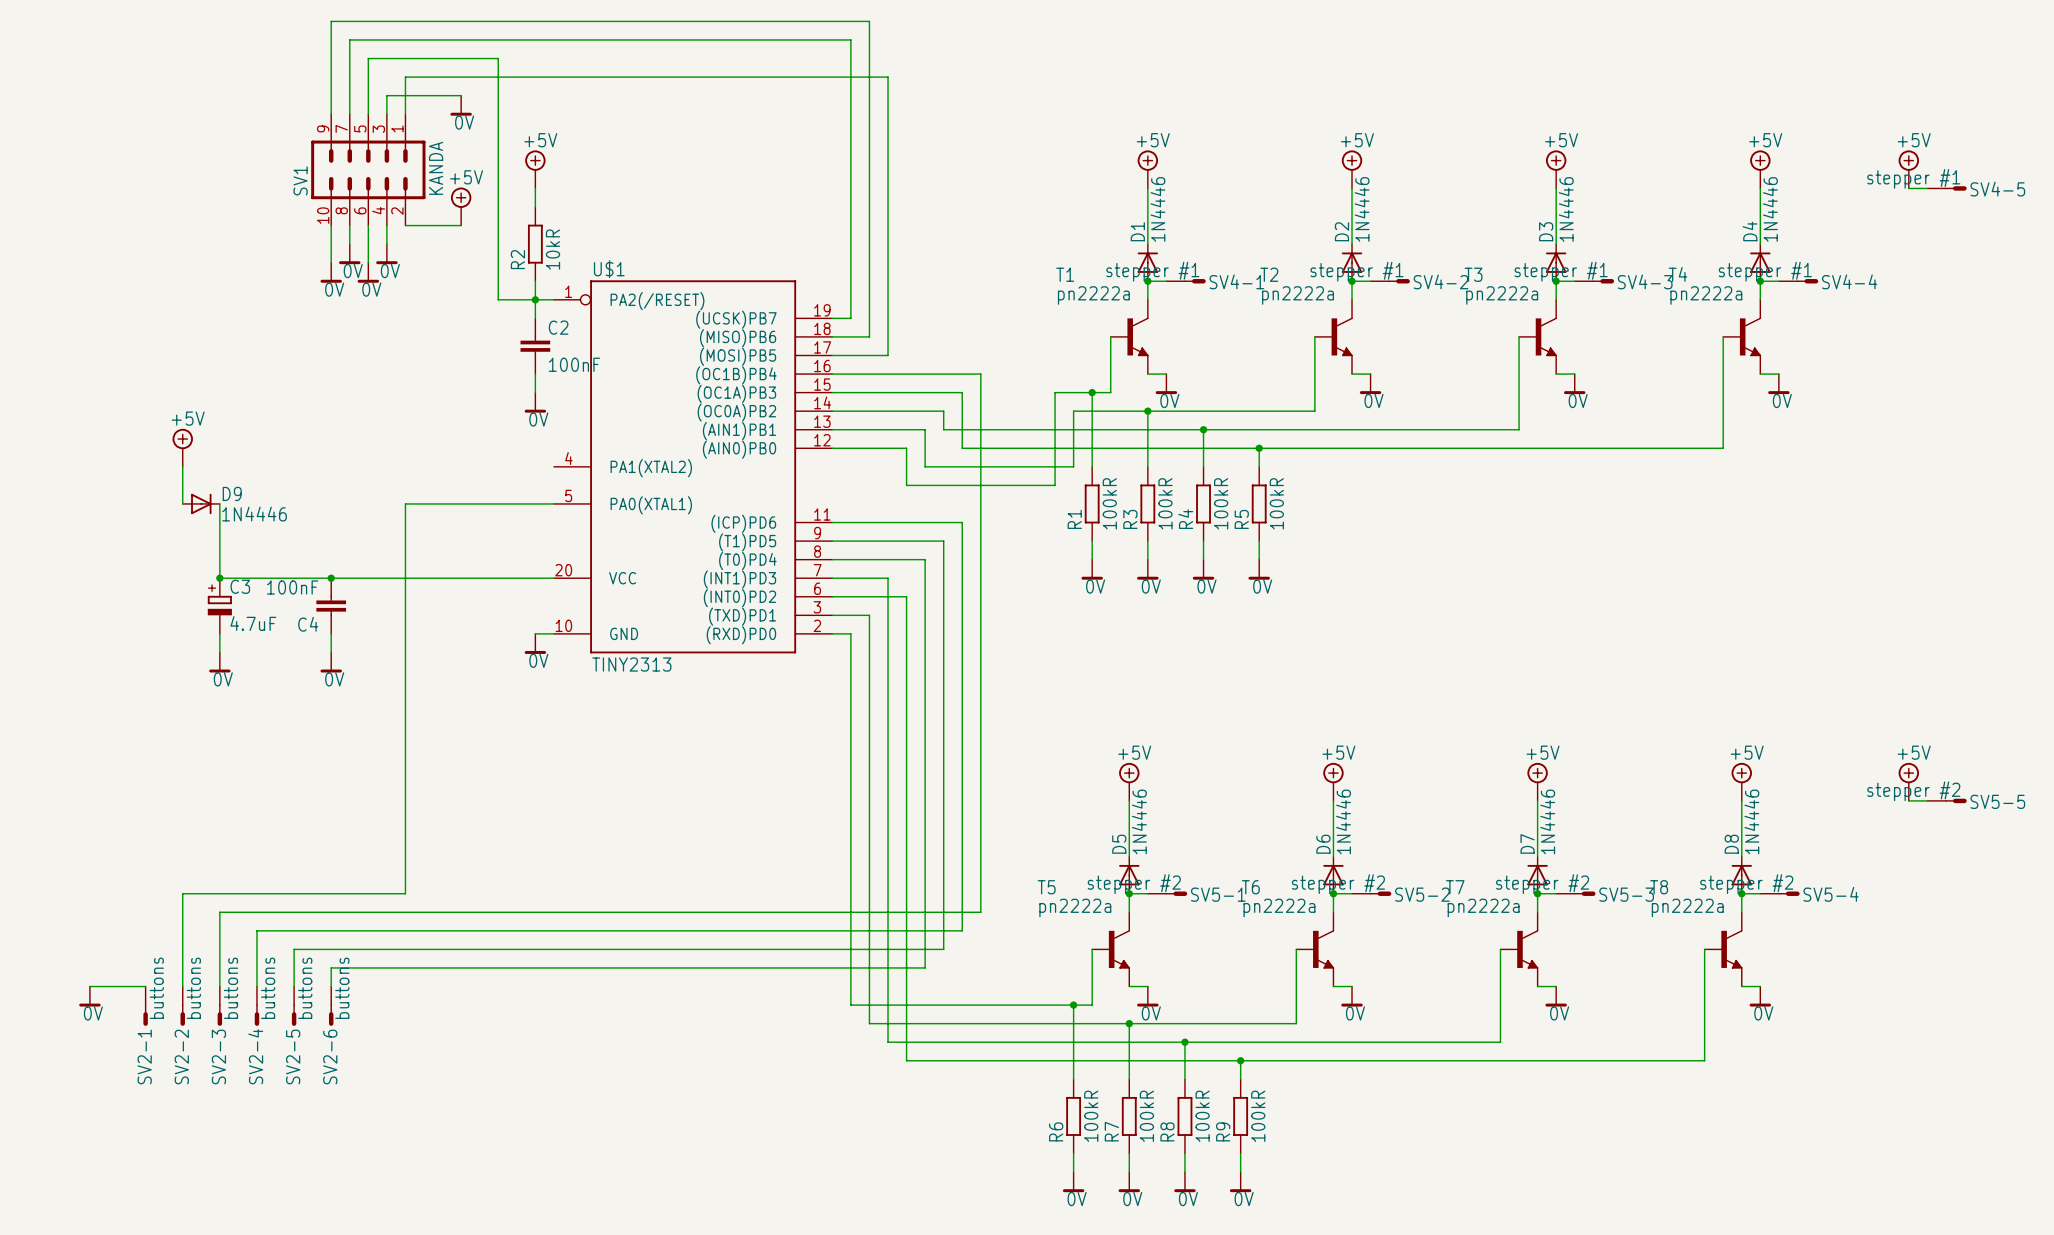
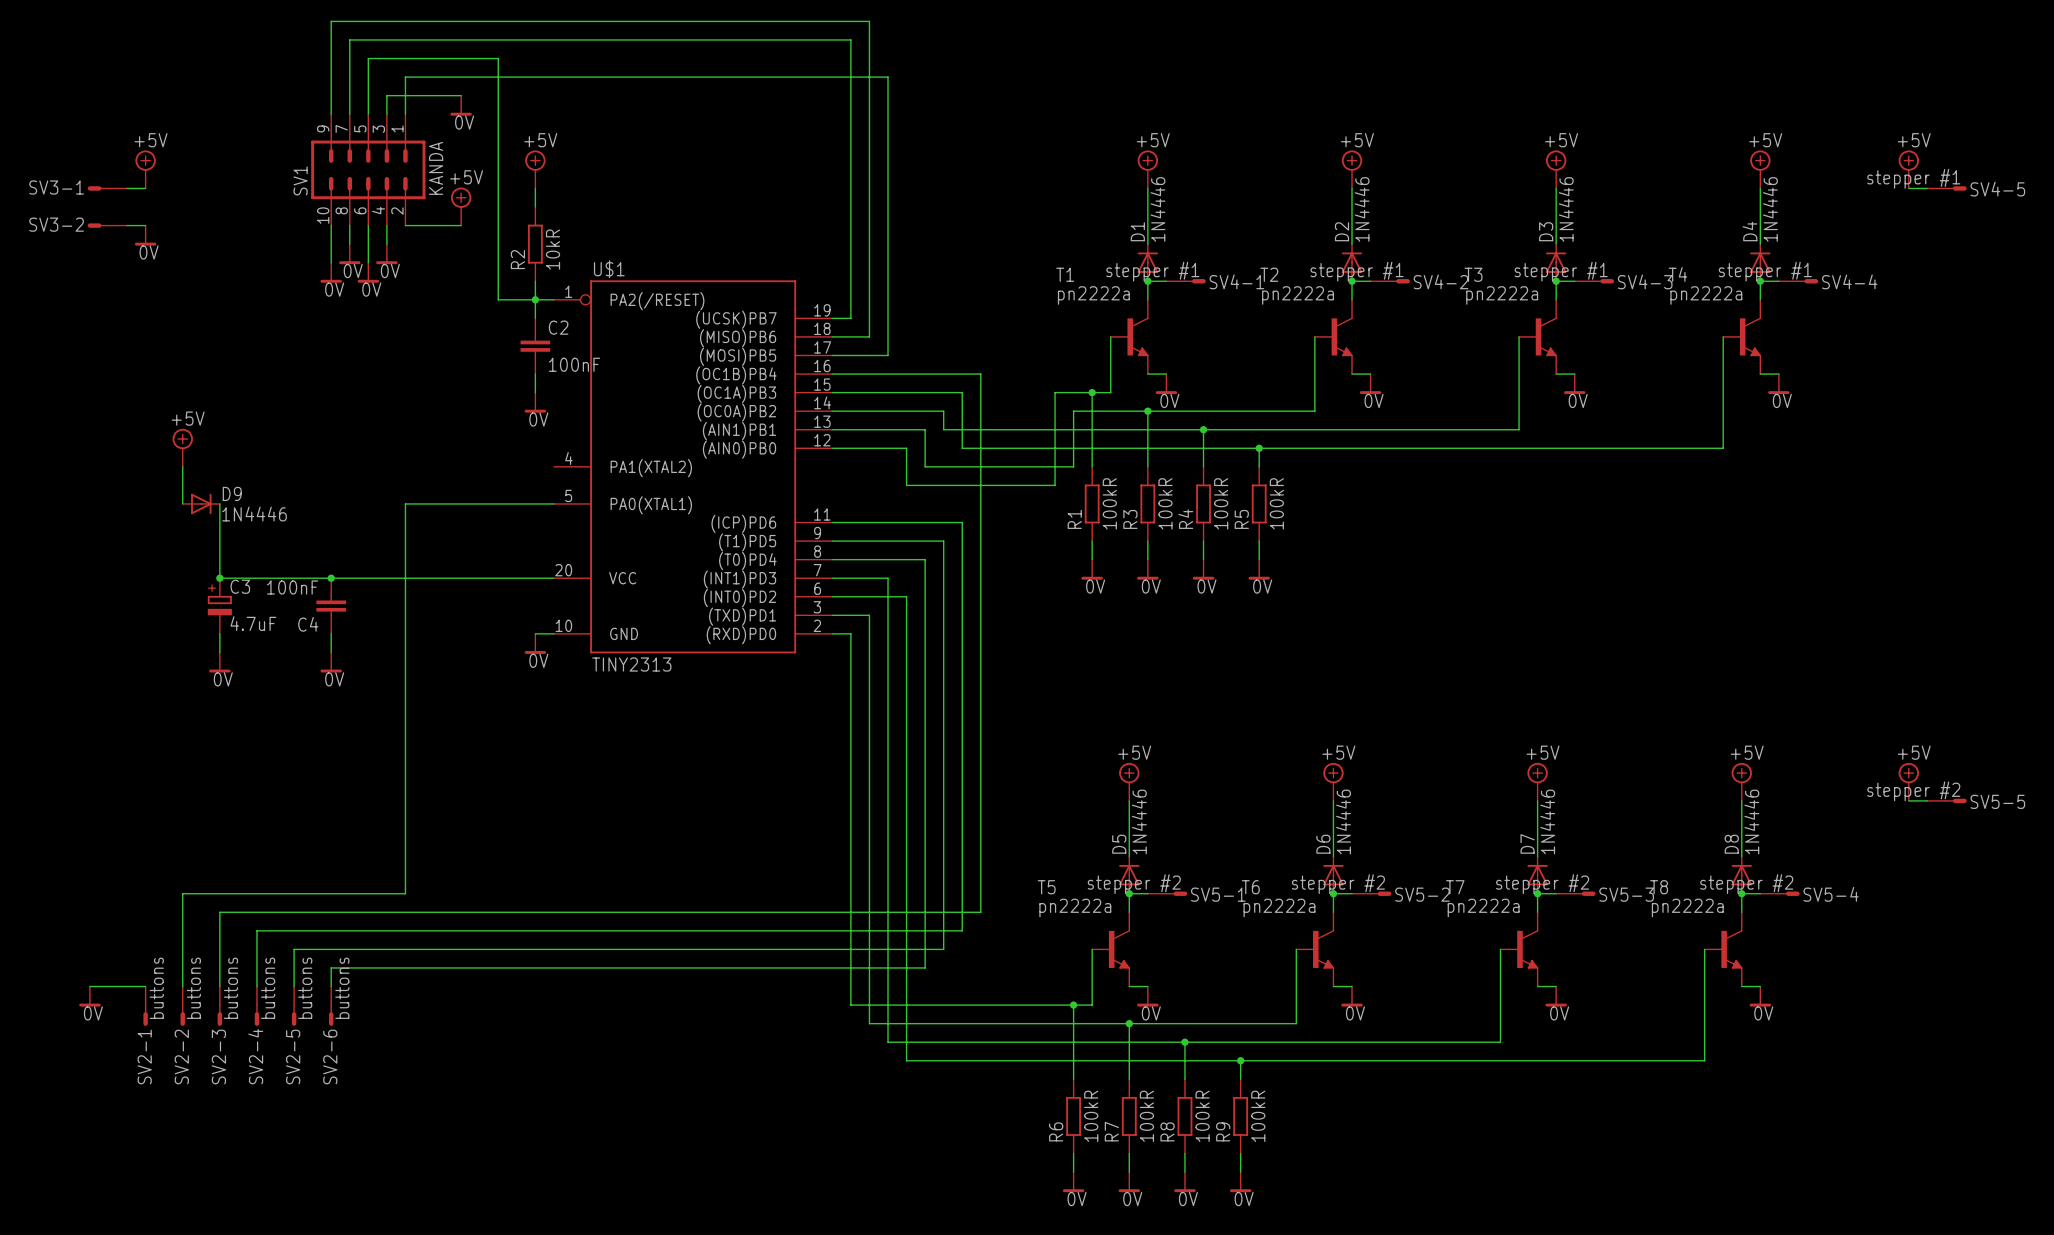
power symbol: none -> +5V (145, 169)
SV3-1: none -> (107, 188)
wire: none -> (127, 188) (145, 188)
SV3-2: none -> (107, 225)
wire: none -> (127, 225) (145, 225)
power symbol: none -> 0V (145, 235)

